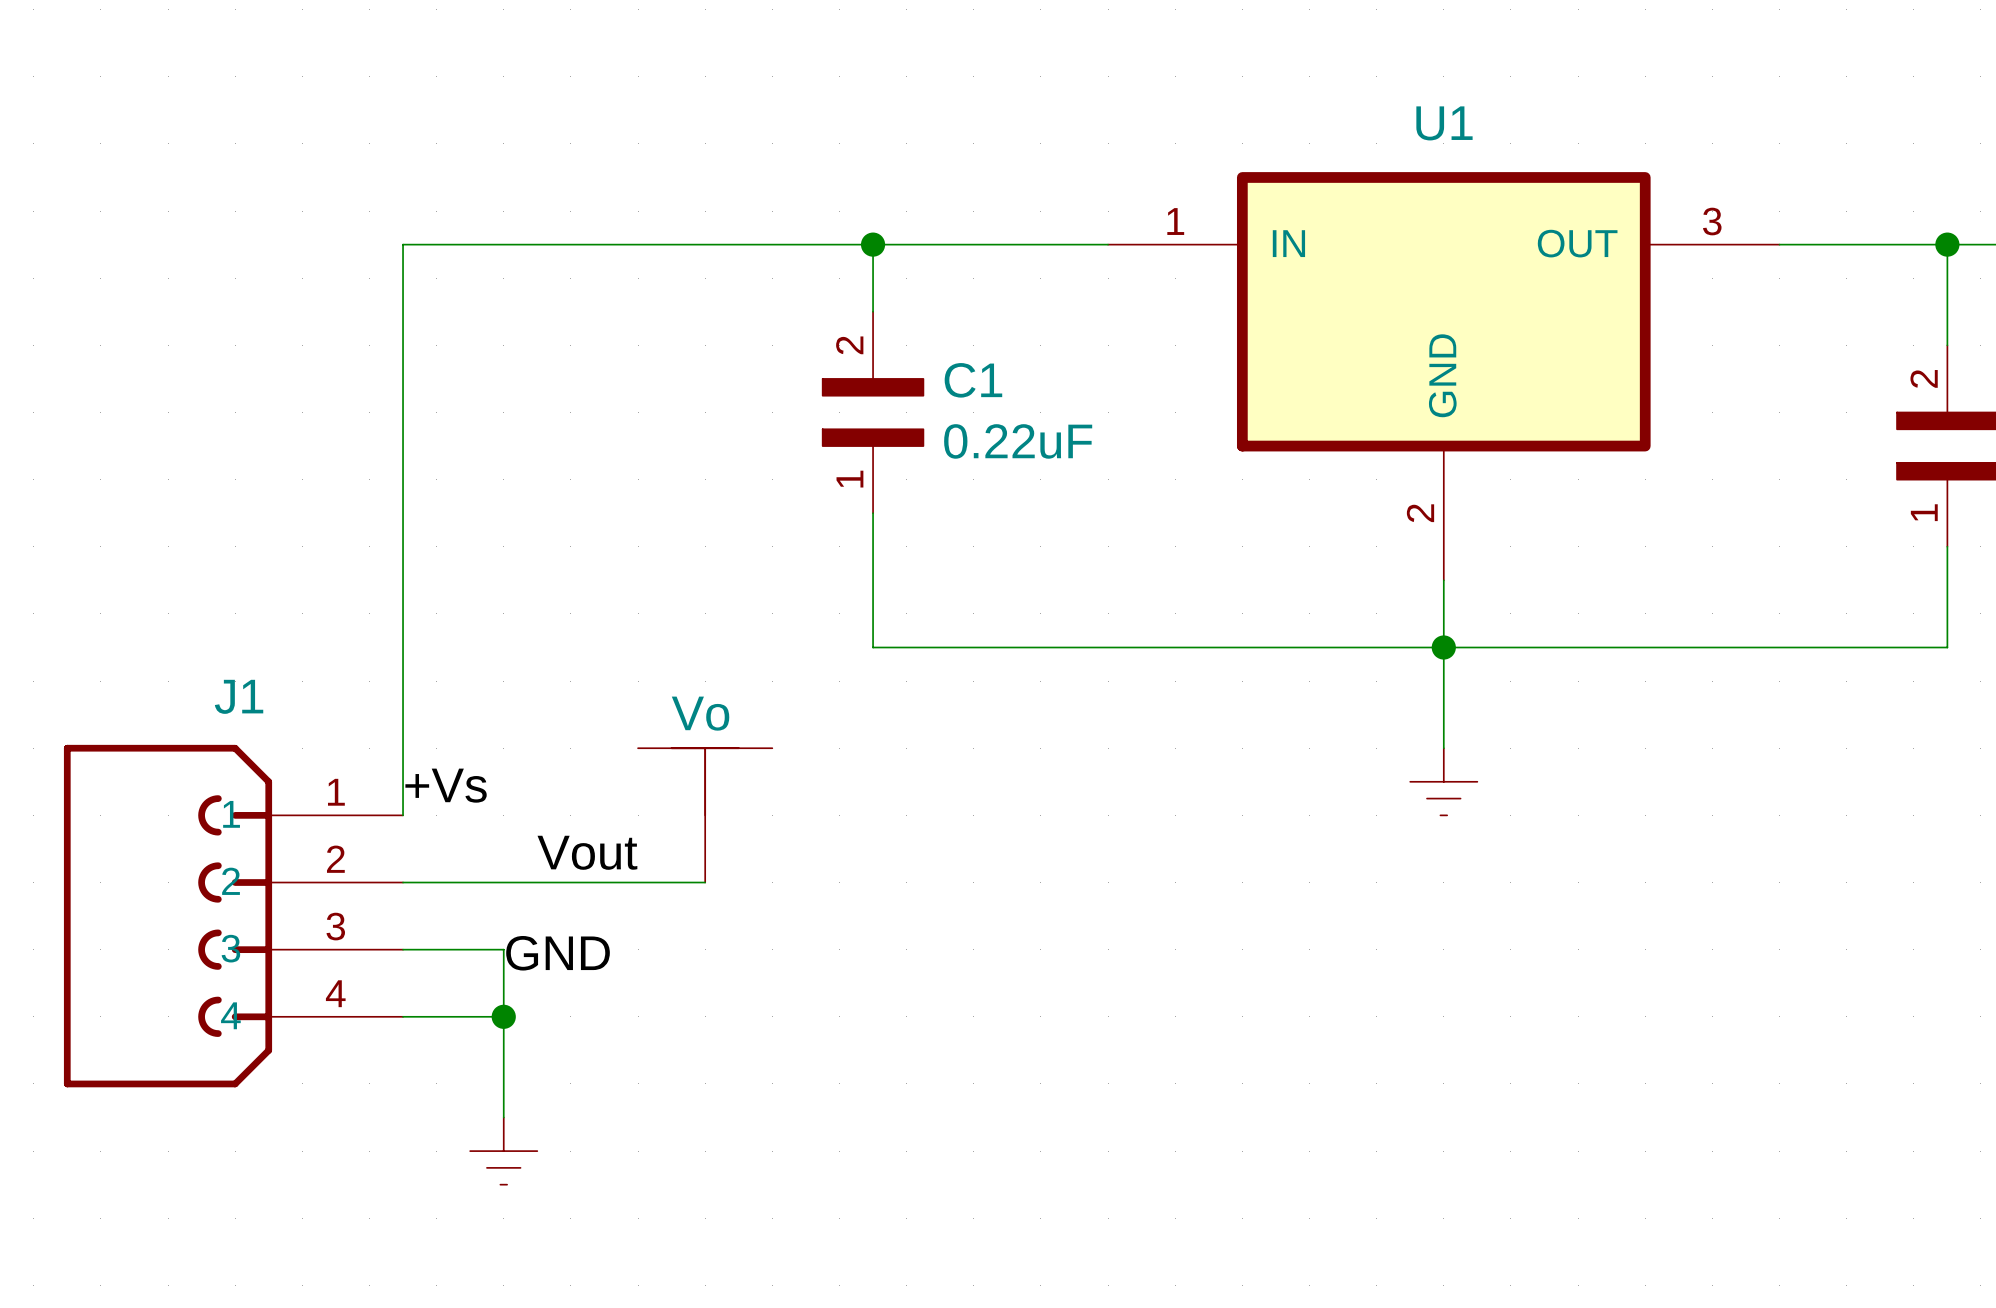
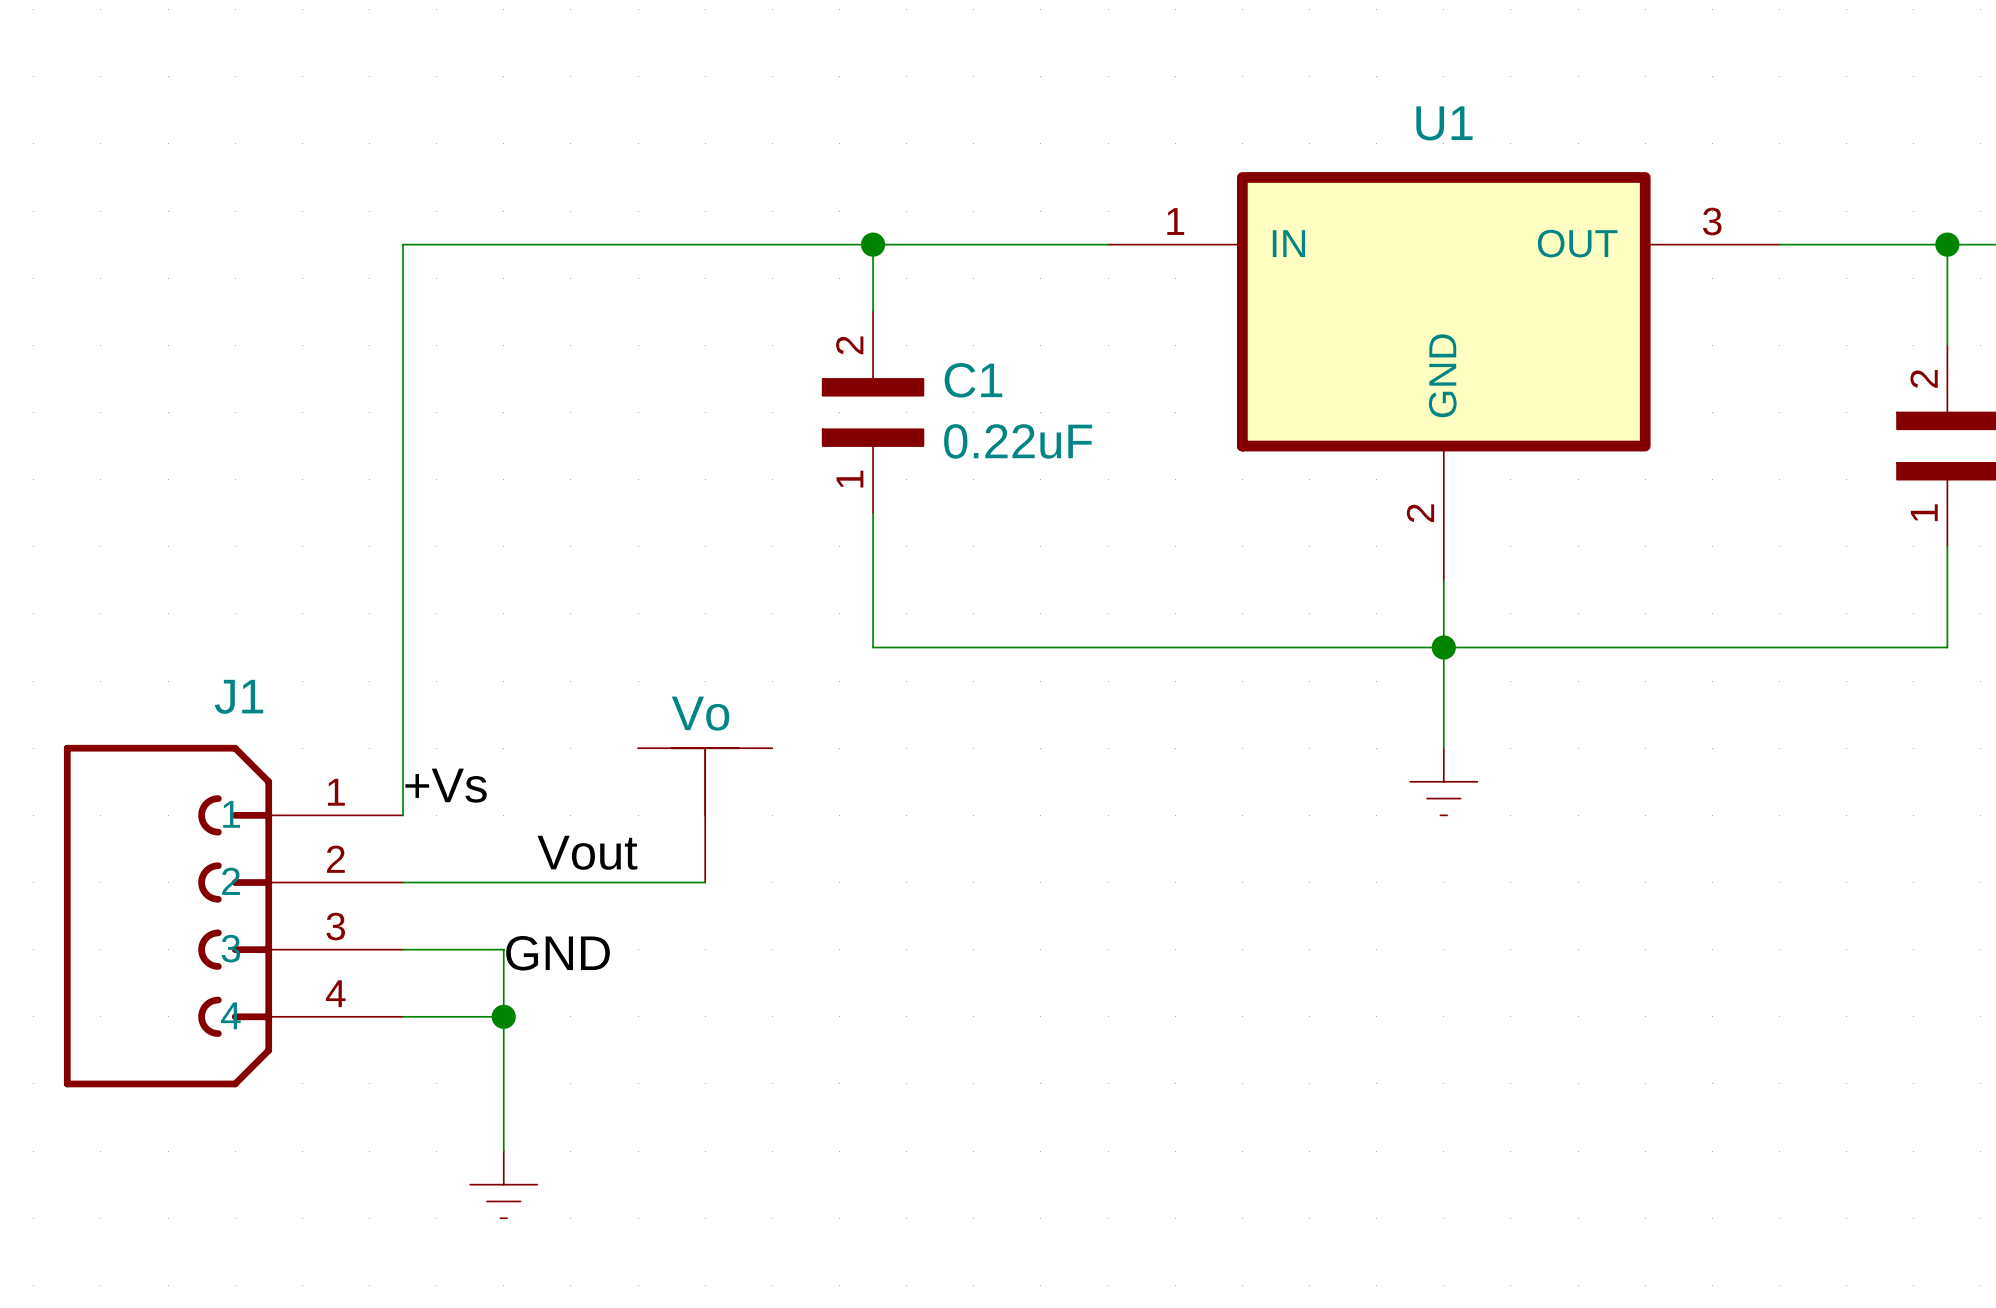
power symbol position: (503, 1151) -> (503, 1184)

